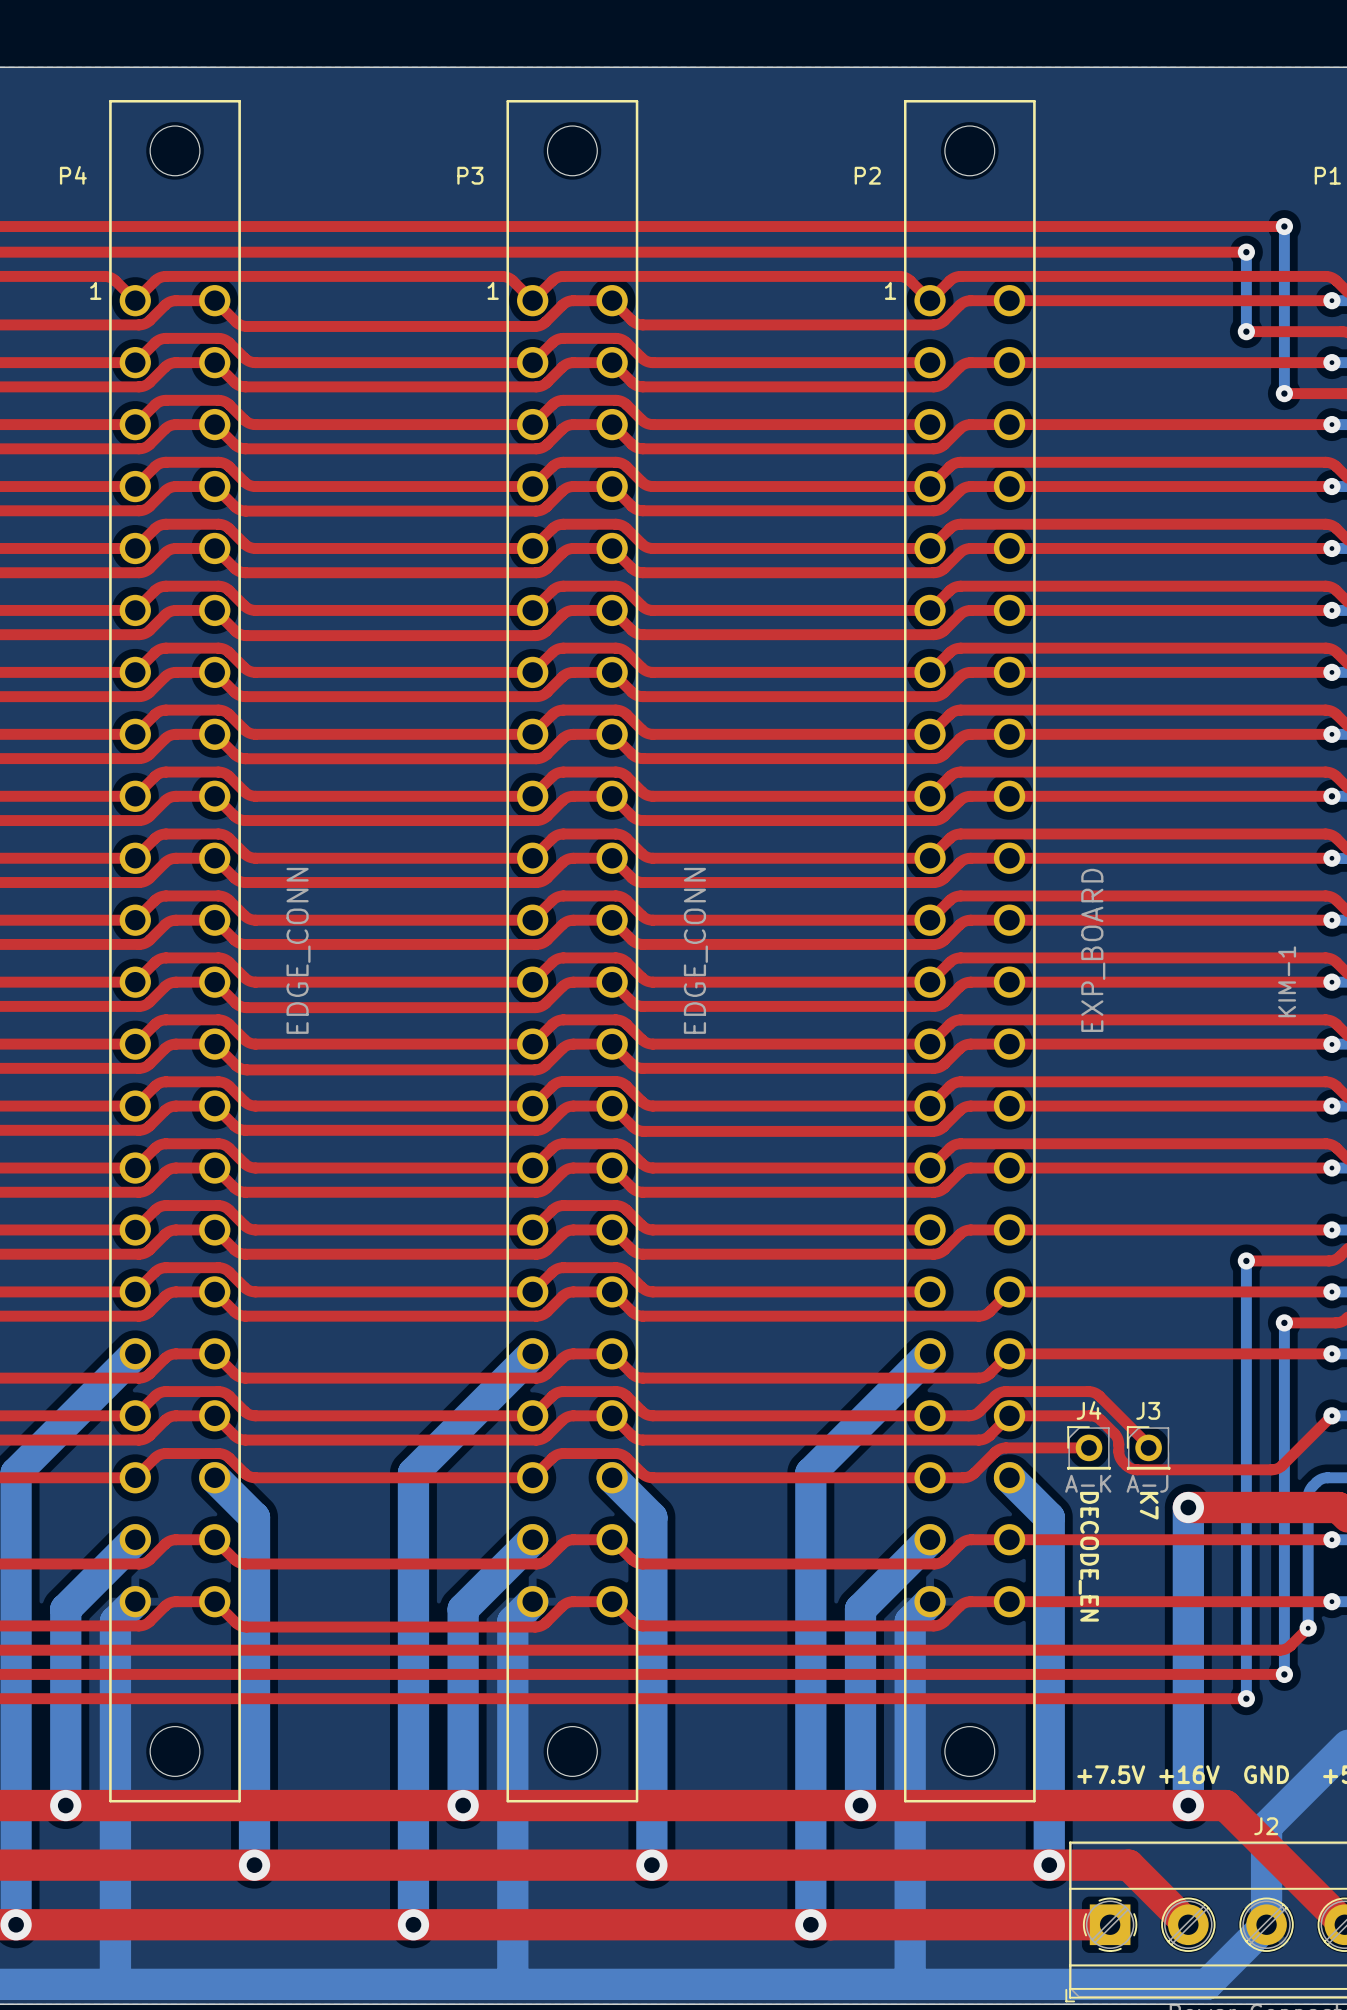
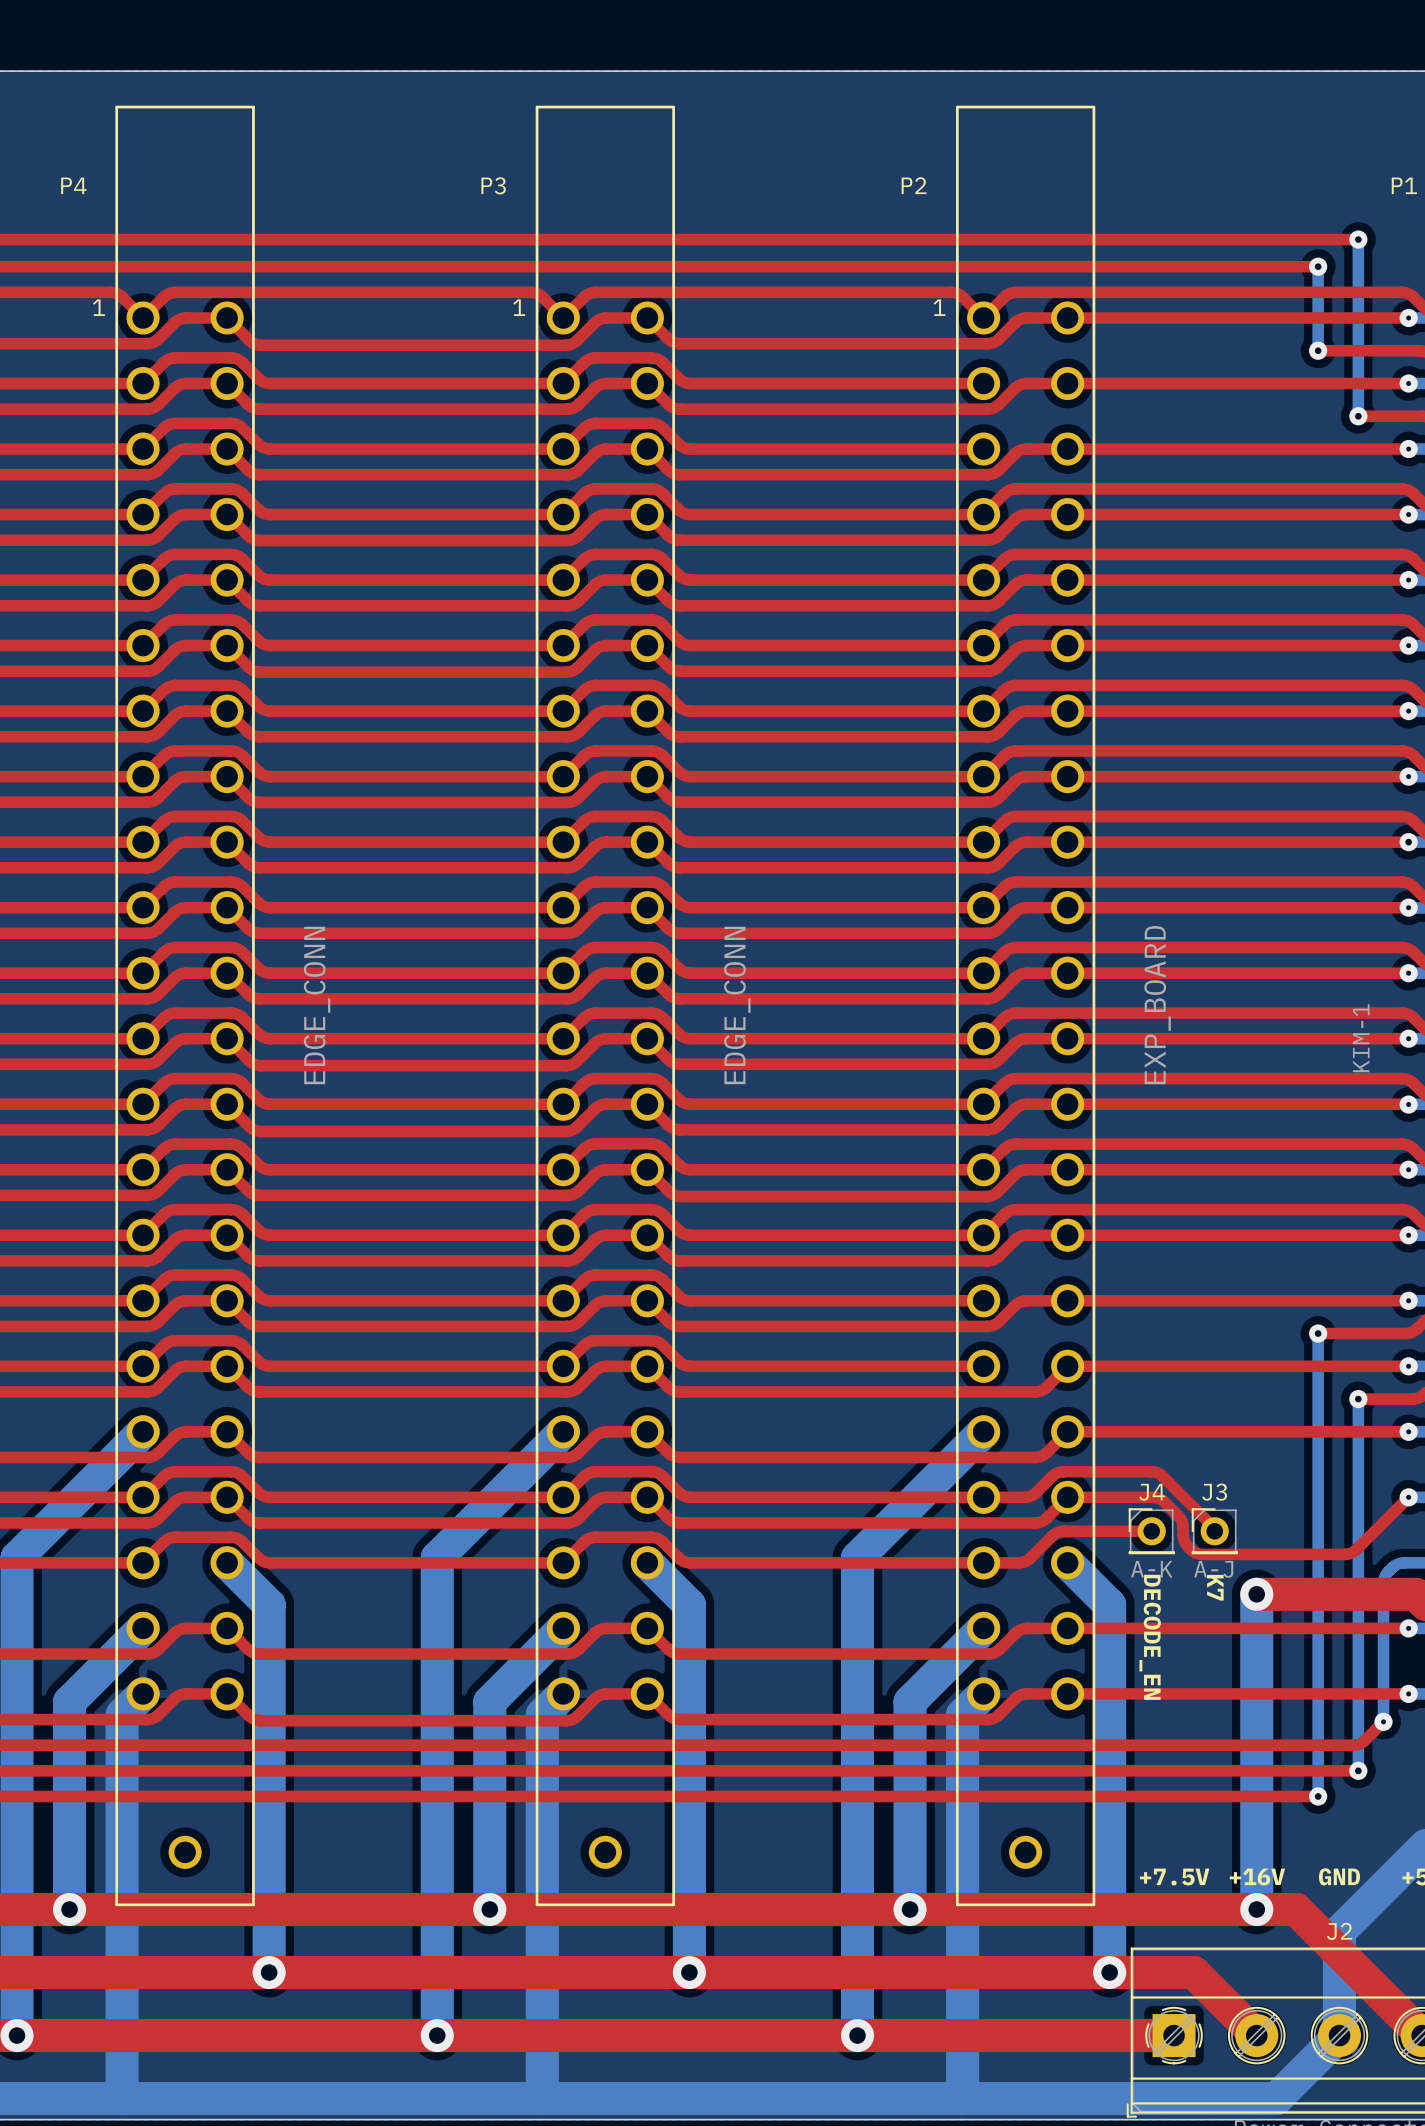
P4 footprint: [109, 100, 241, 1803] -> [115, 105, 255, 1907]
P3 footprint: [506, 100, 639, 1803] -> [535, 105, 675, 1907]
P2 footprint: [904, 100, 1036, 1803] -> [956, 105, 1096, 1907]

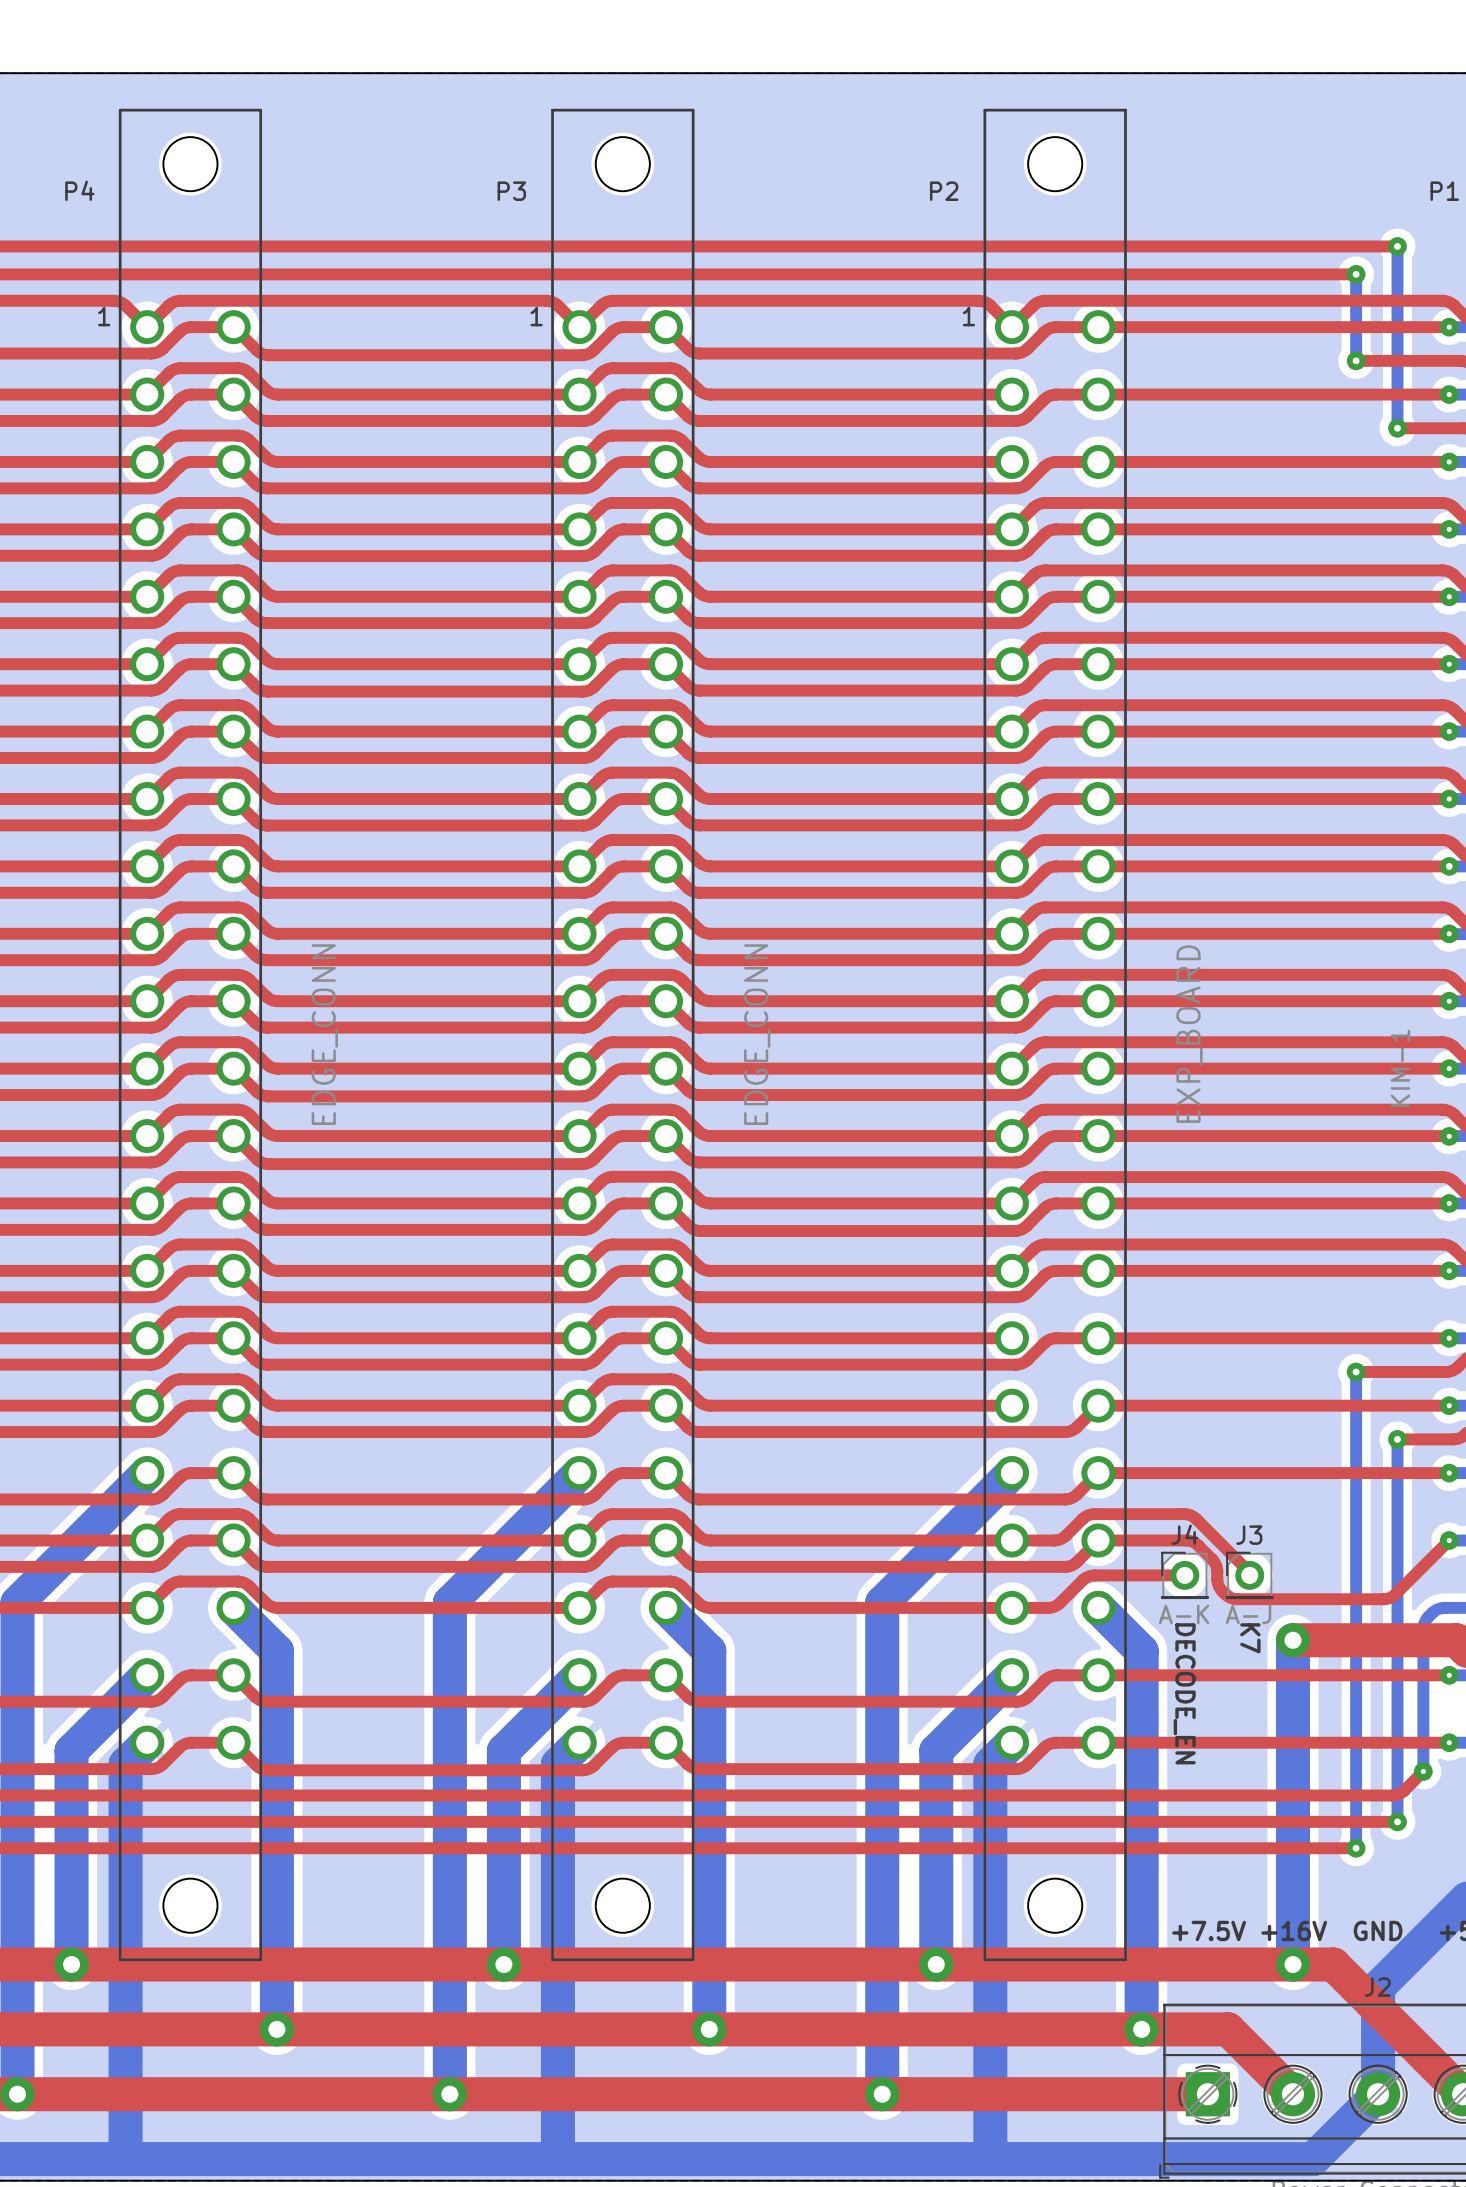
P4 footprint: [115, 105, 255, 1907] -> [118, 108, 263, 1962]
P3 footprint: [535, 105, 675, 1907] -> [551, 108, 695, 1962]
P2 footprint: [956, 105, 1096, 1907] -> [983, 108, 1127, 1962]

